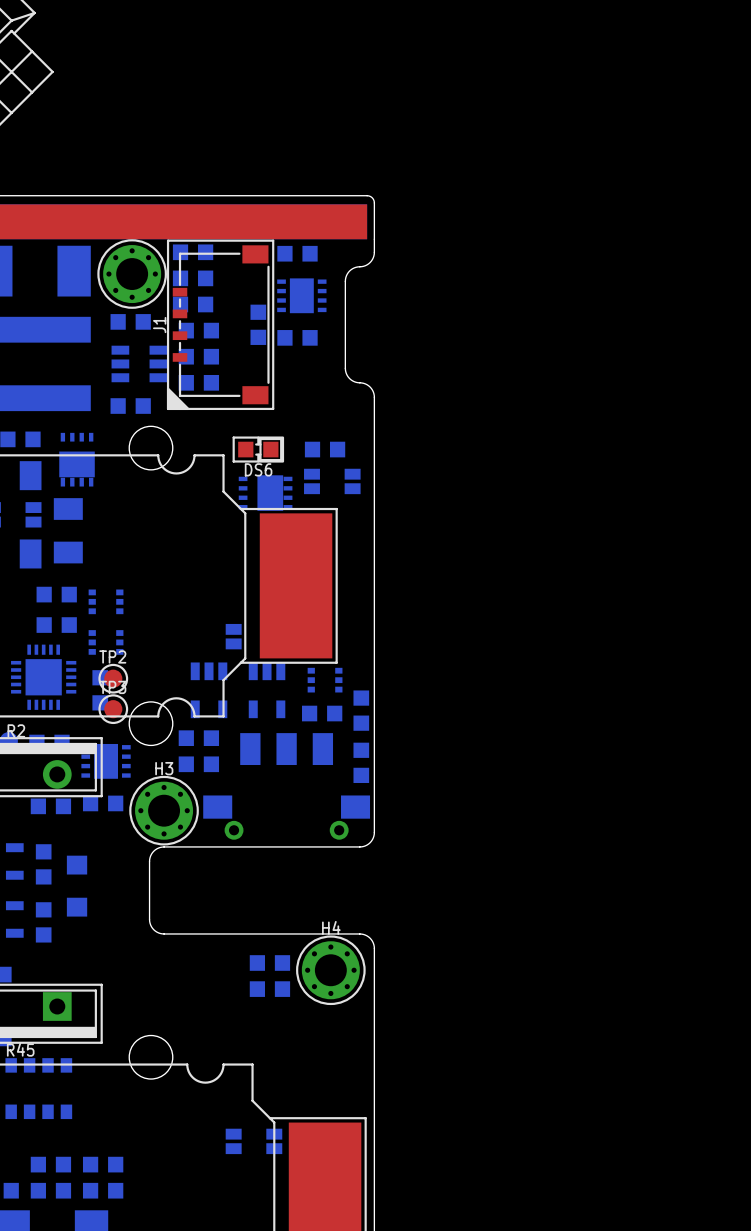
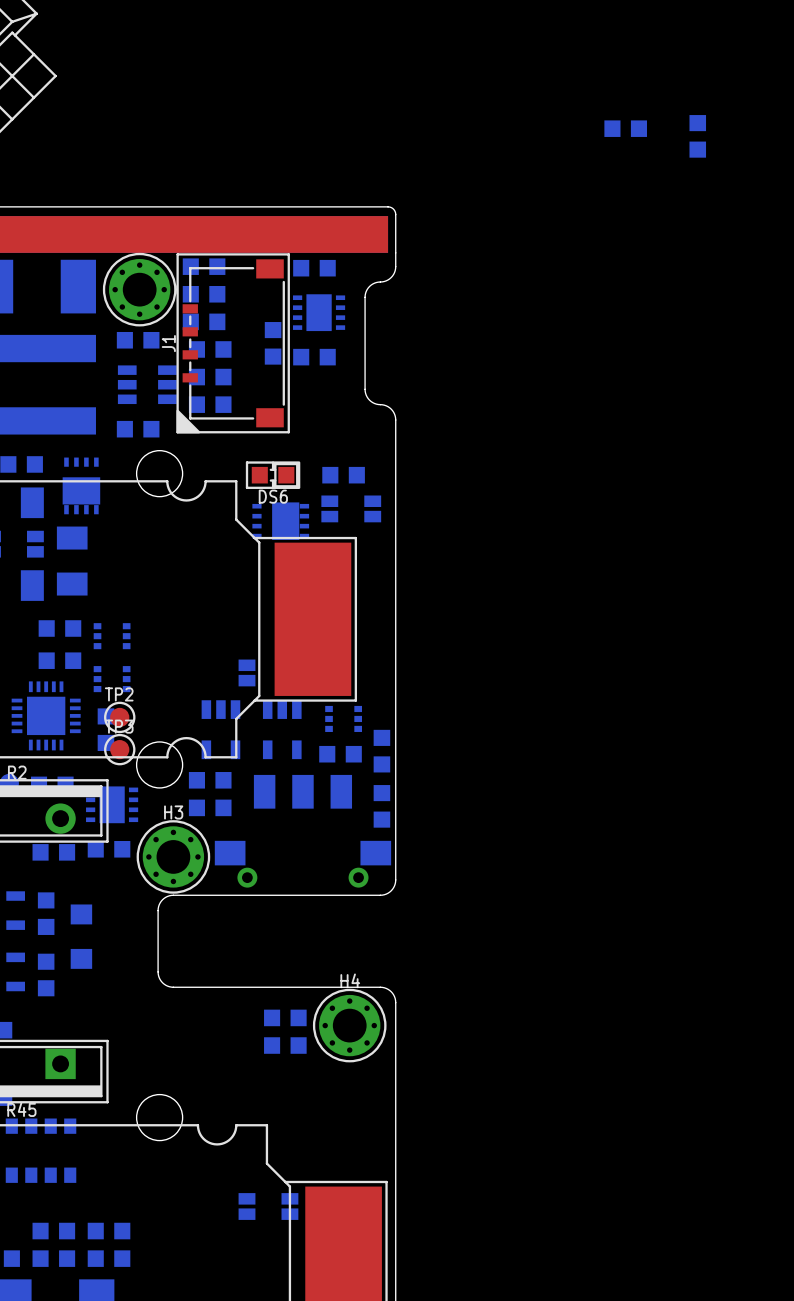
part: none -> (625, 128)
part: none -> (697, 136)

